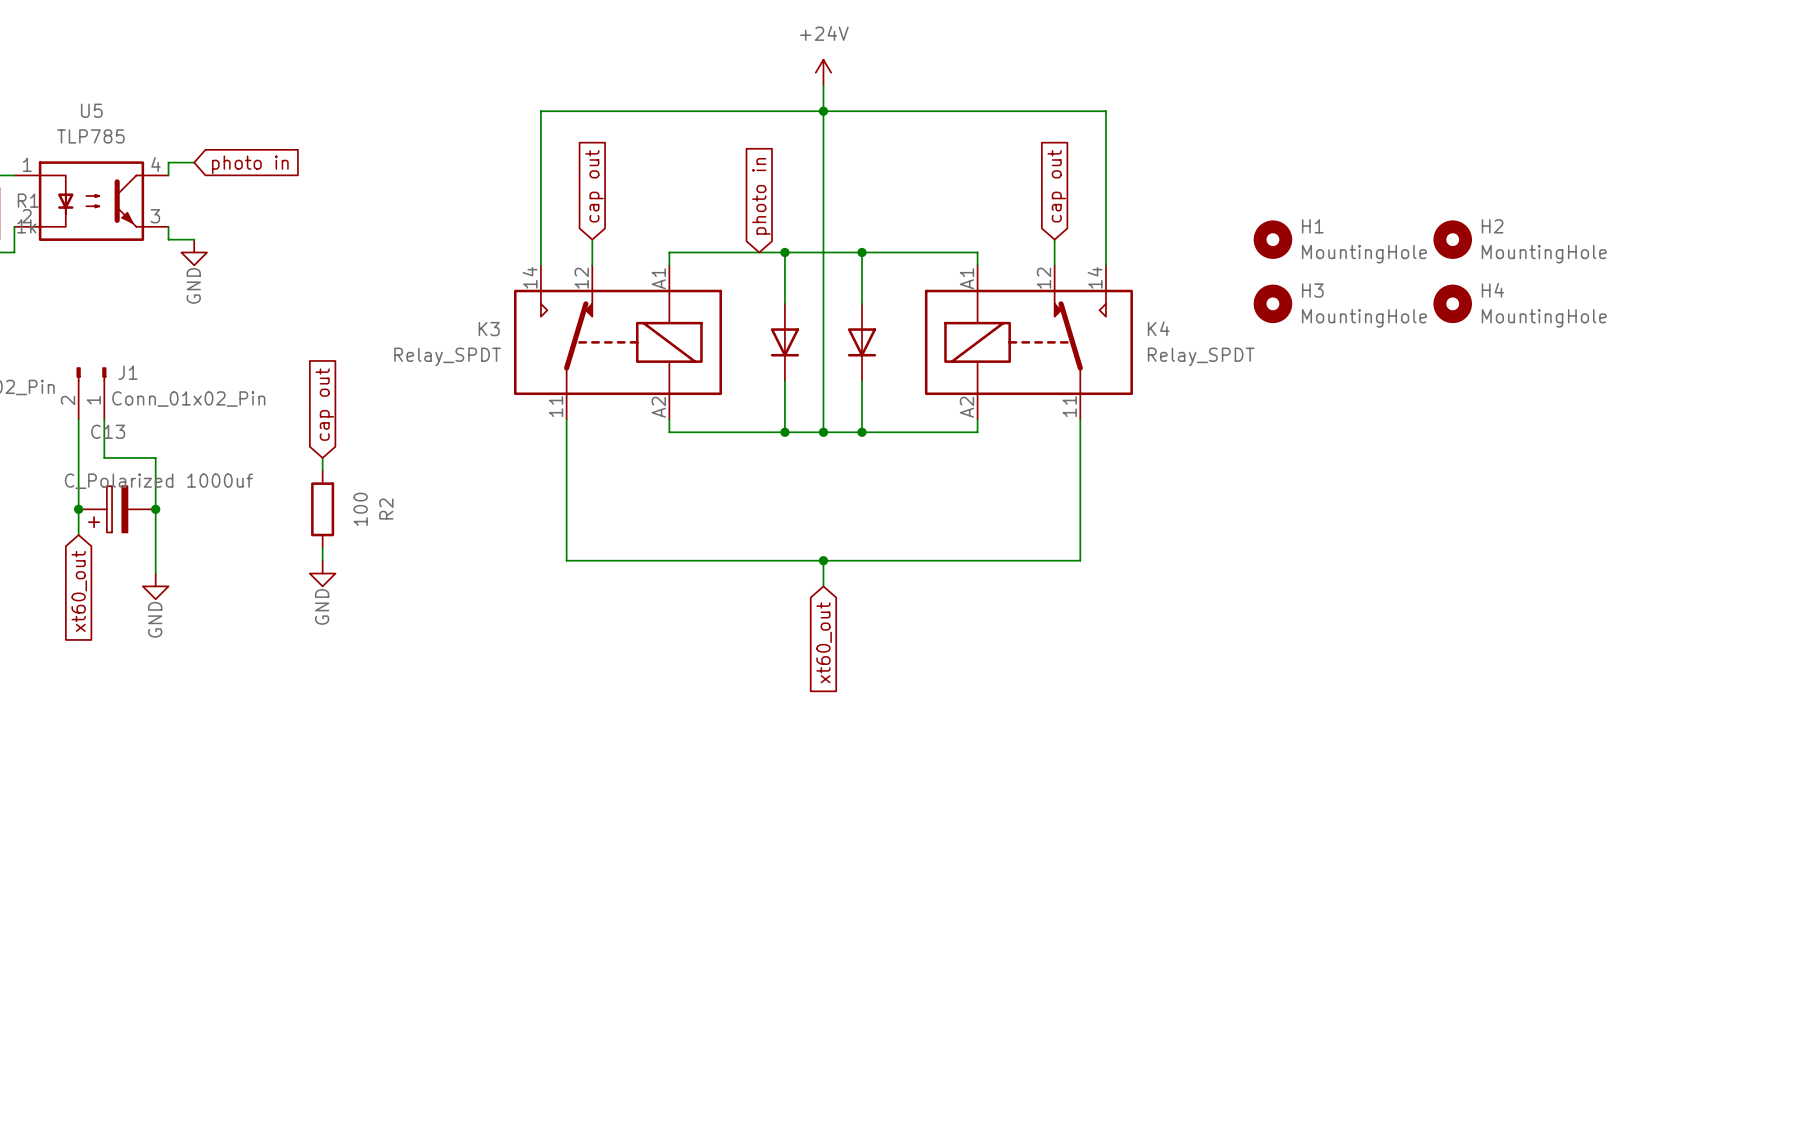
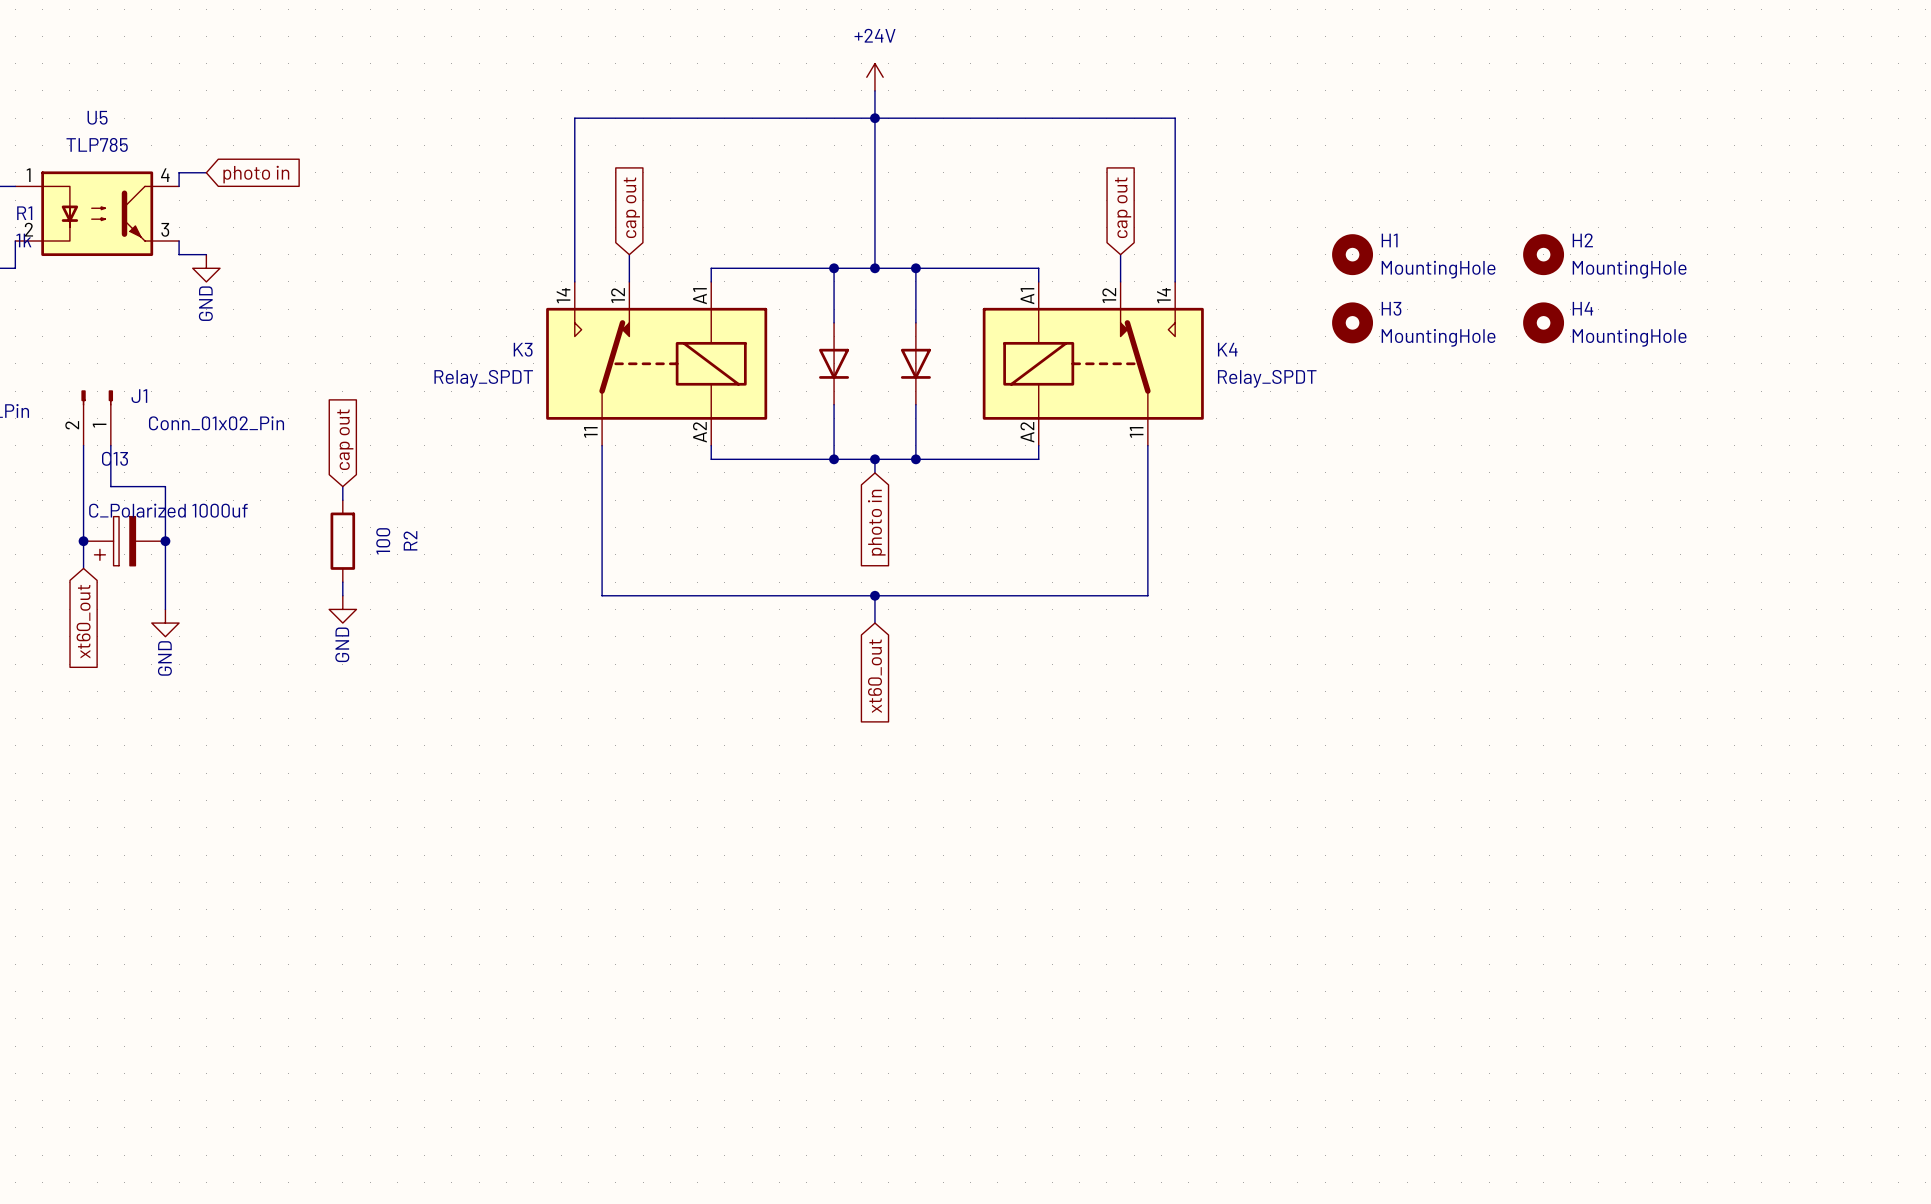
global label rotation: 0° (761, 196) -> 180° (876, 522)
global label position: photo in (761, 196) -> photo in (876, 522)
wire: (823, 252) (823, 432) -> (874, 472) (874, 459)
junction: none -> (874, 268)

